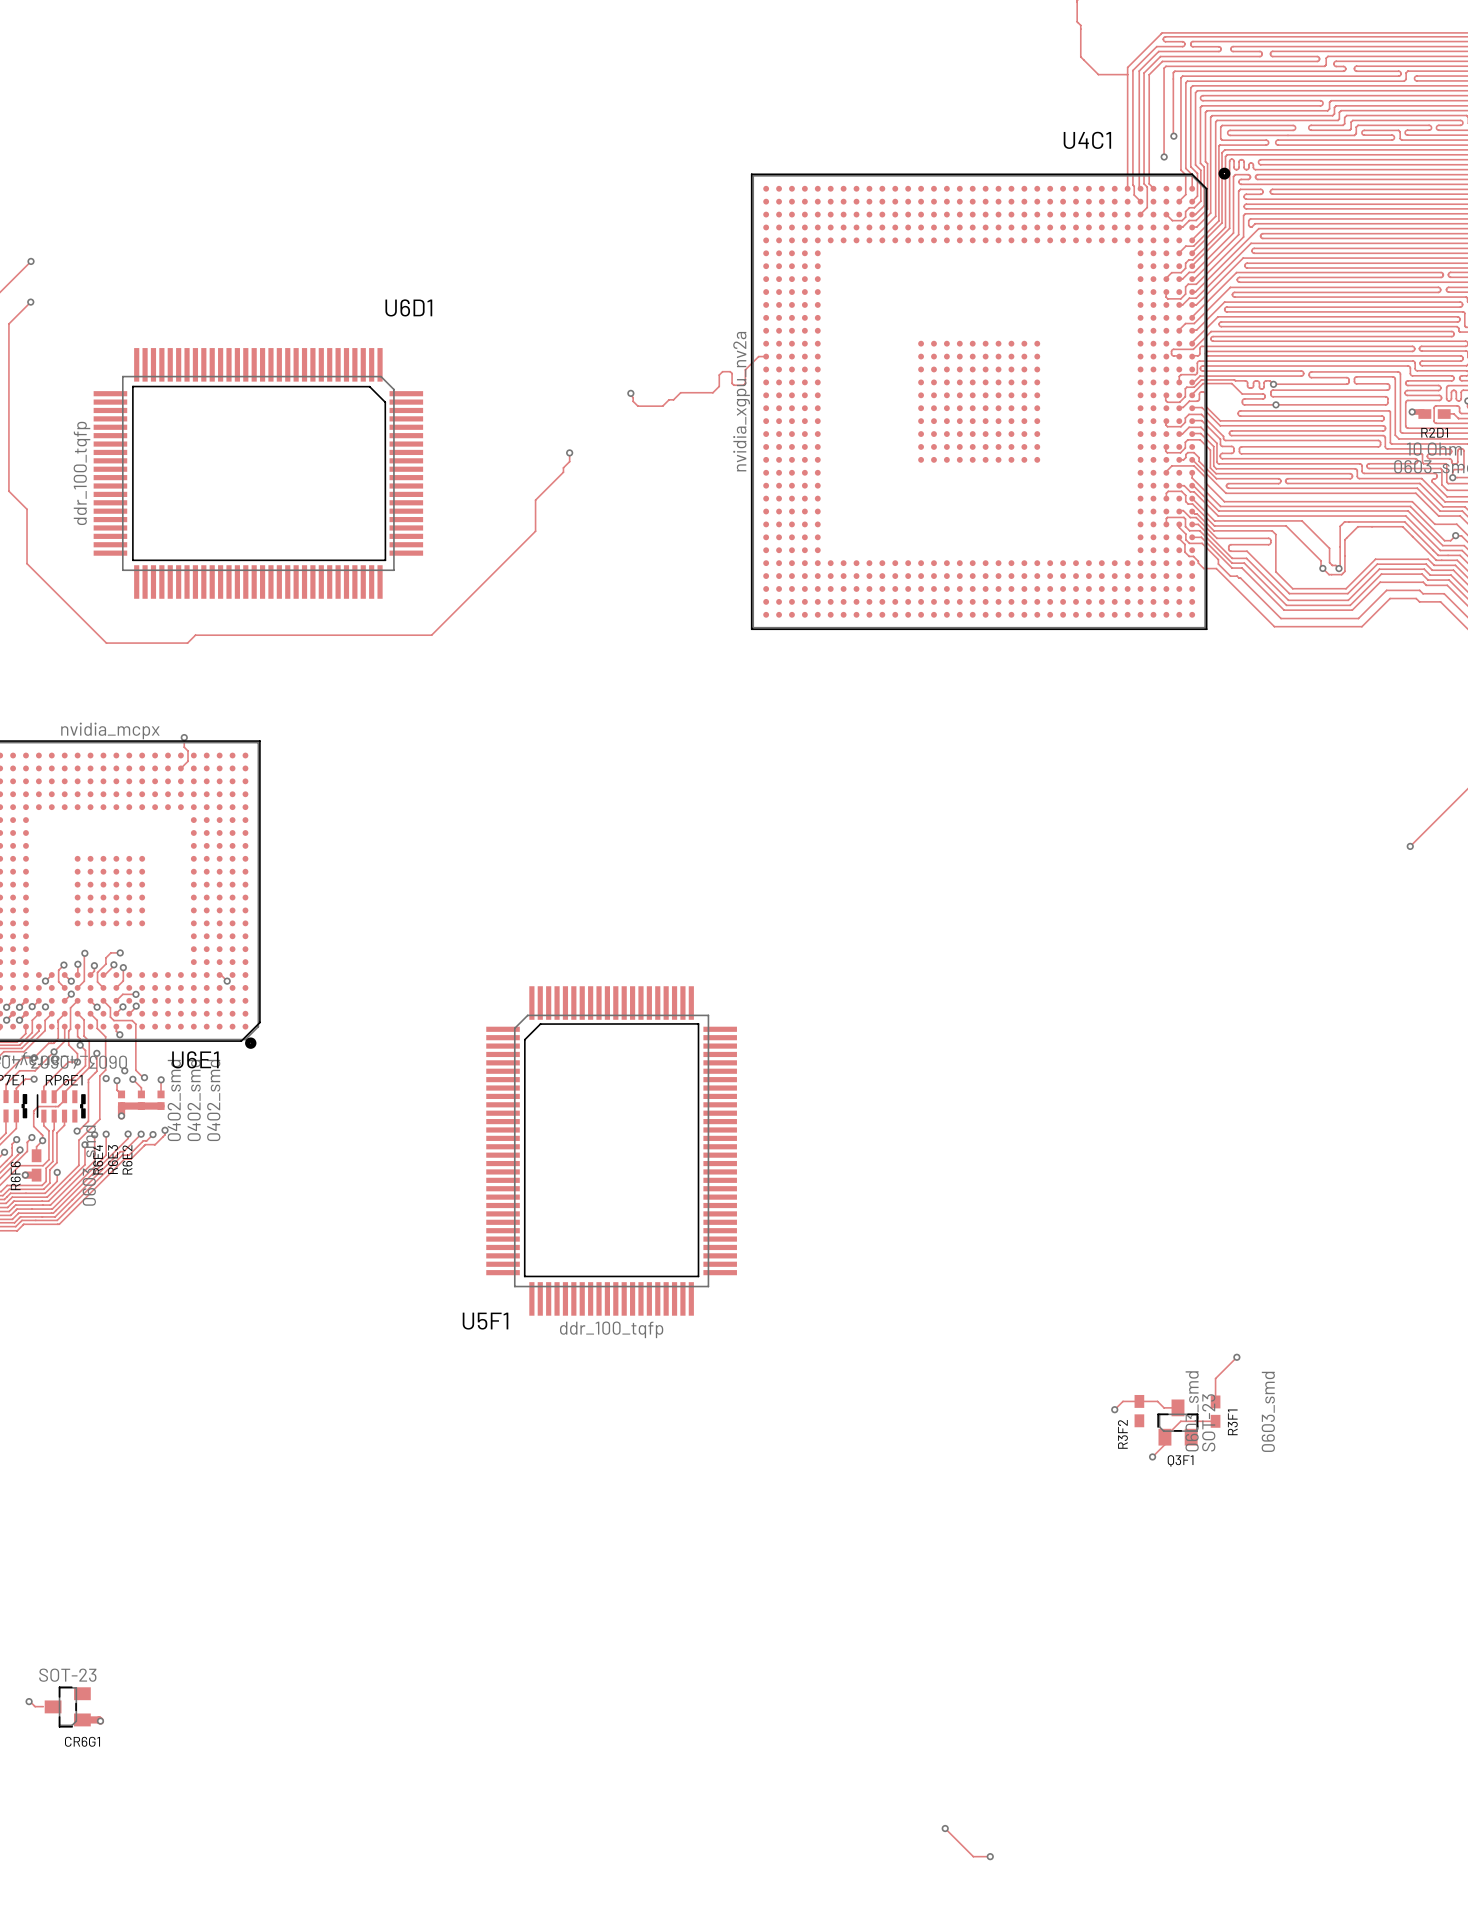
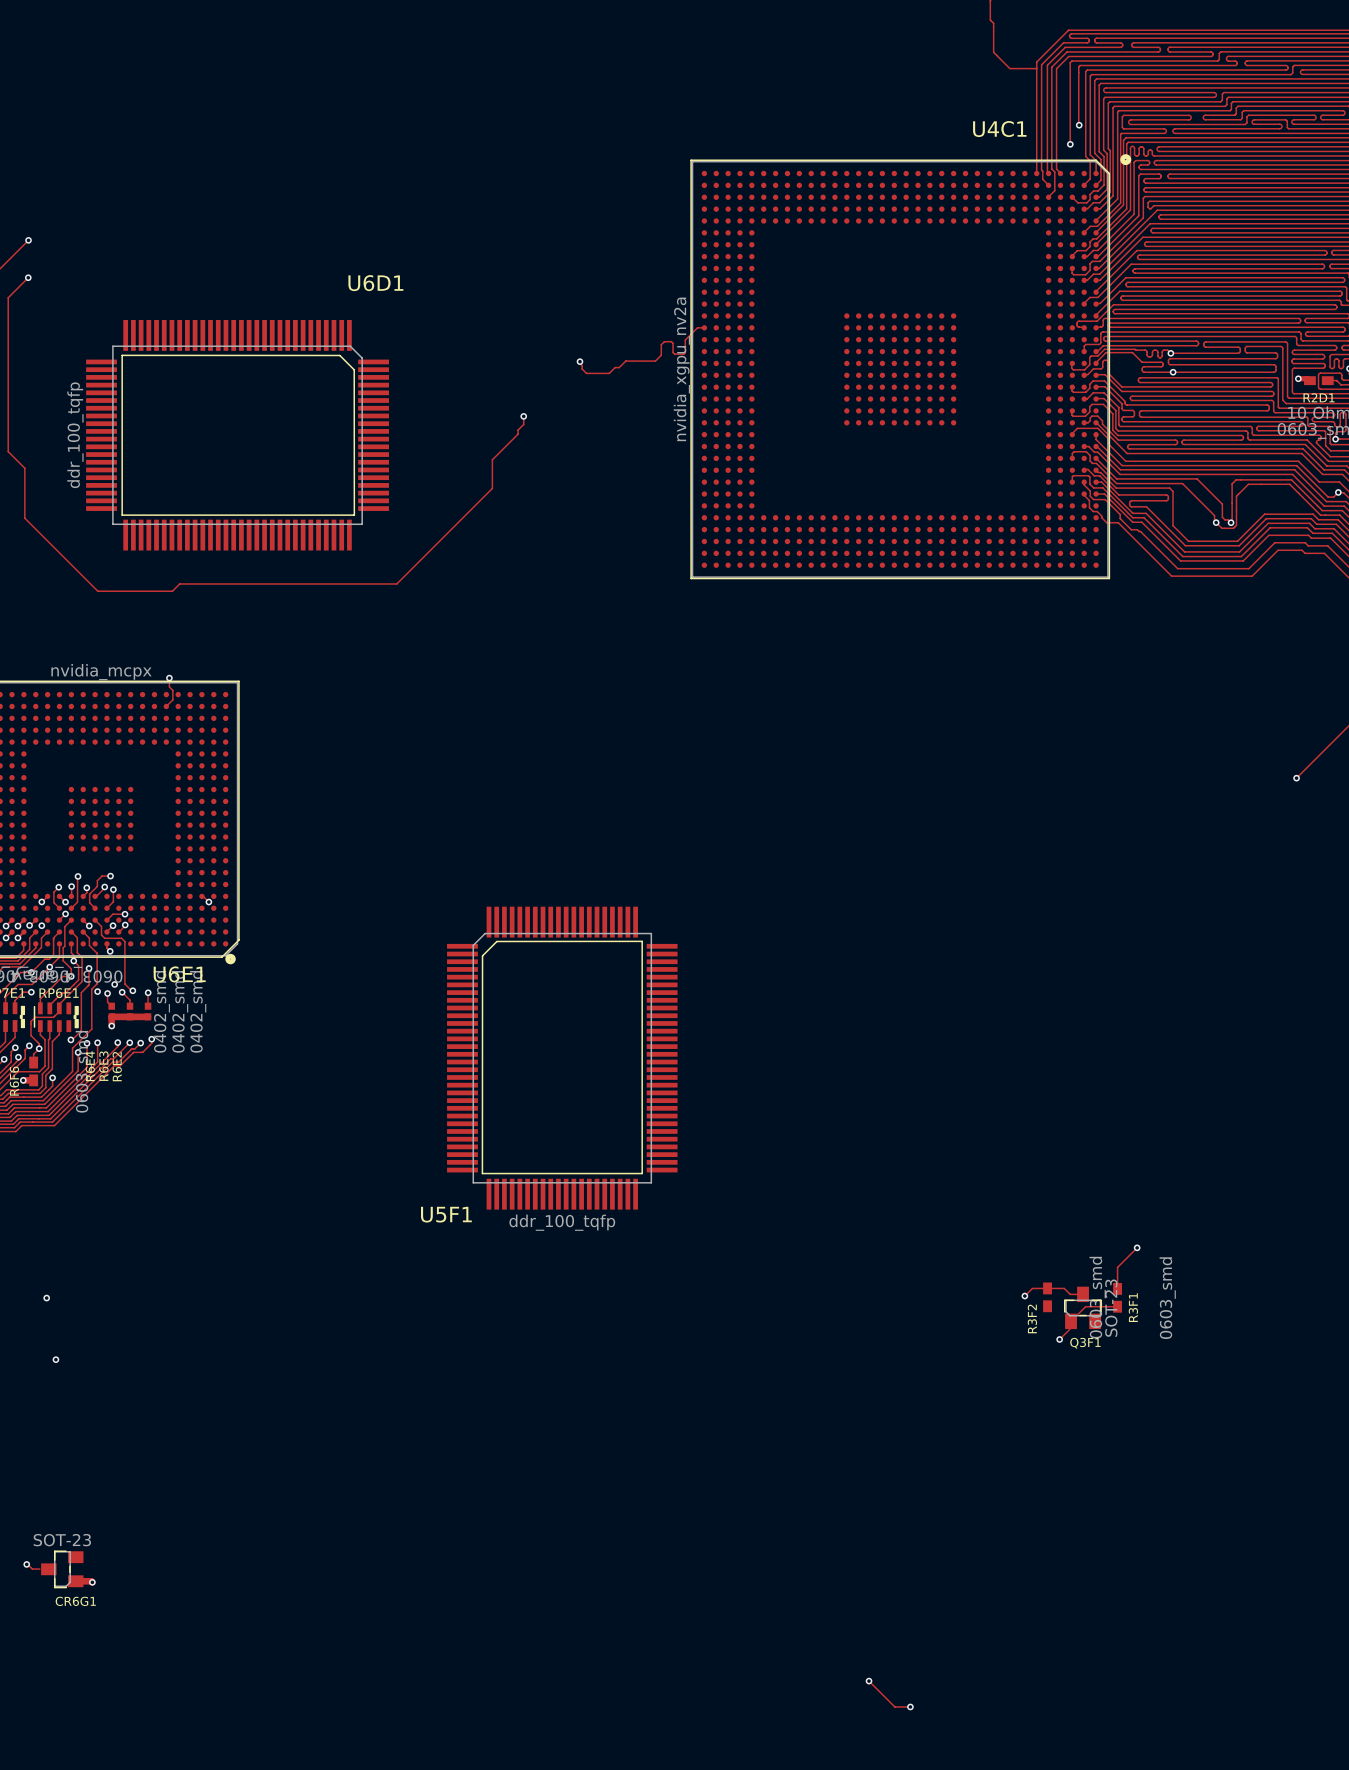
via: none -> (46, 1298)
via: none -> (55, 1359)

